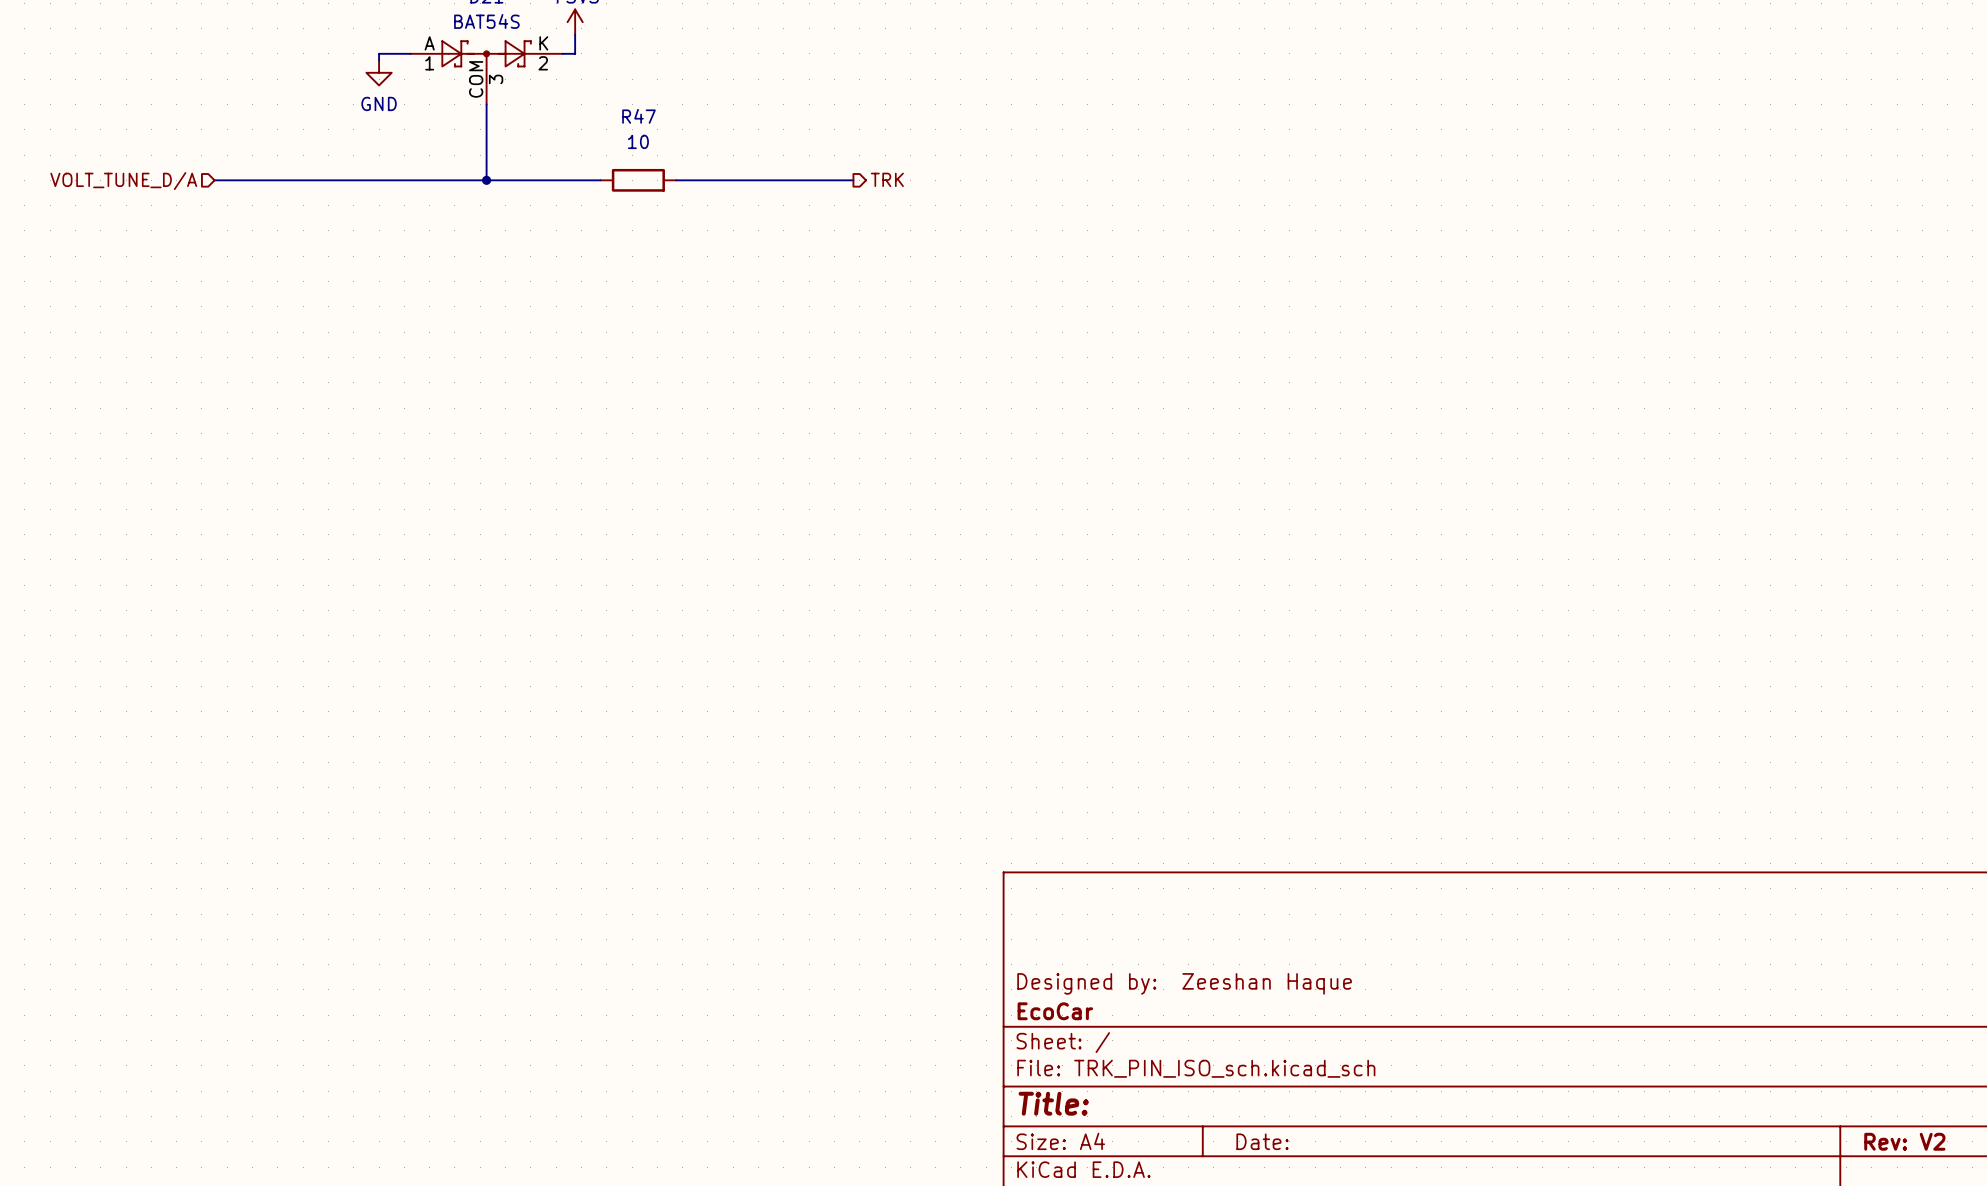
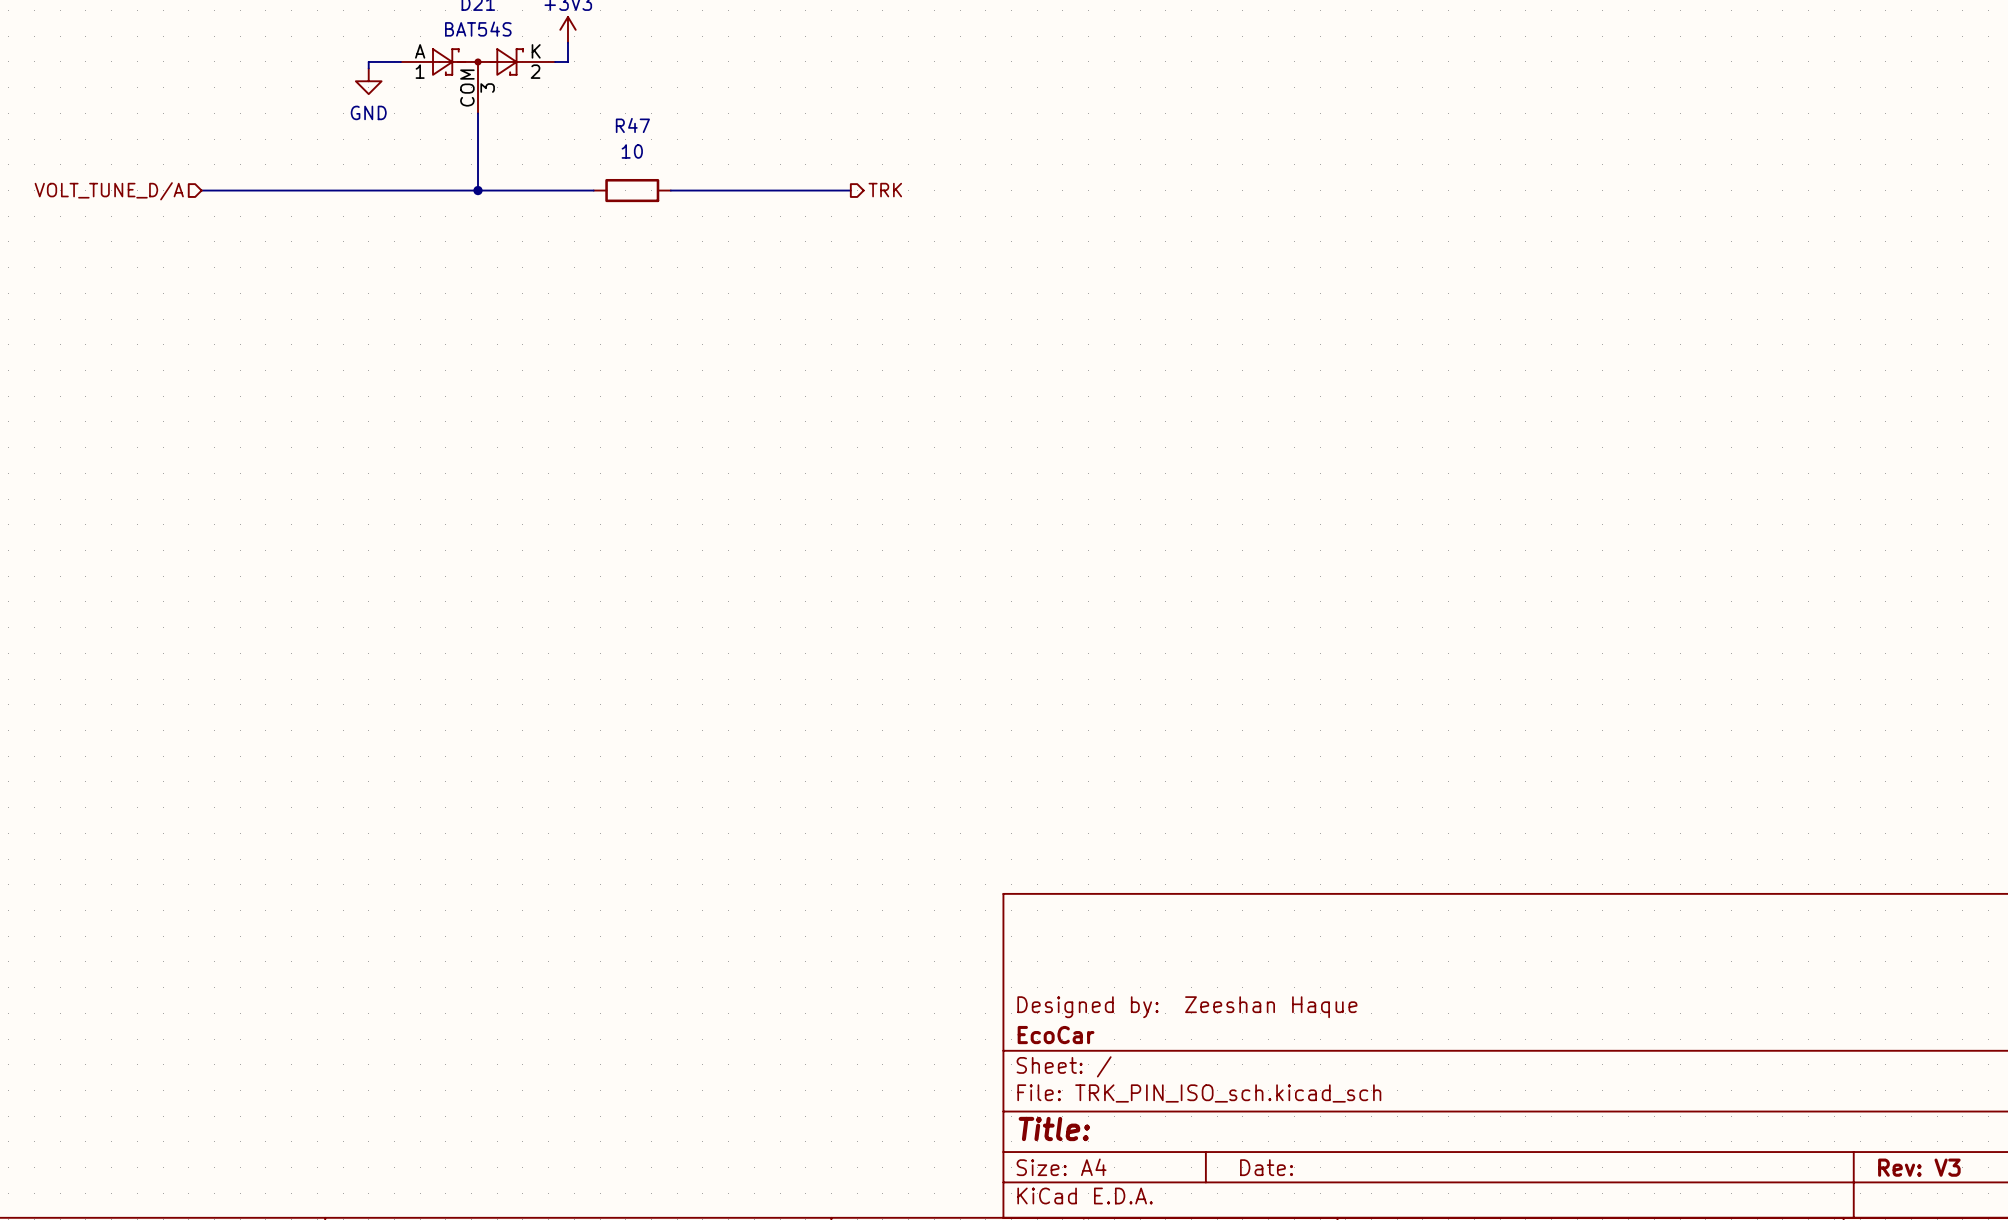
title block: Rev: V2 (1904, 1141) -> Rev: V3 (1919, 1167)

